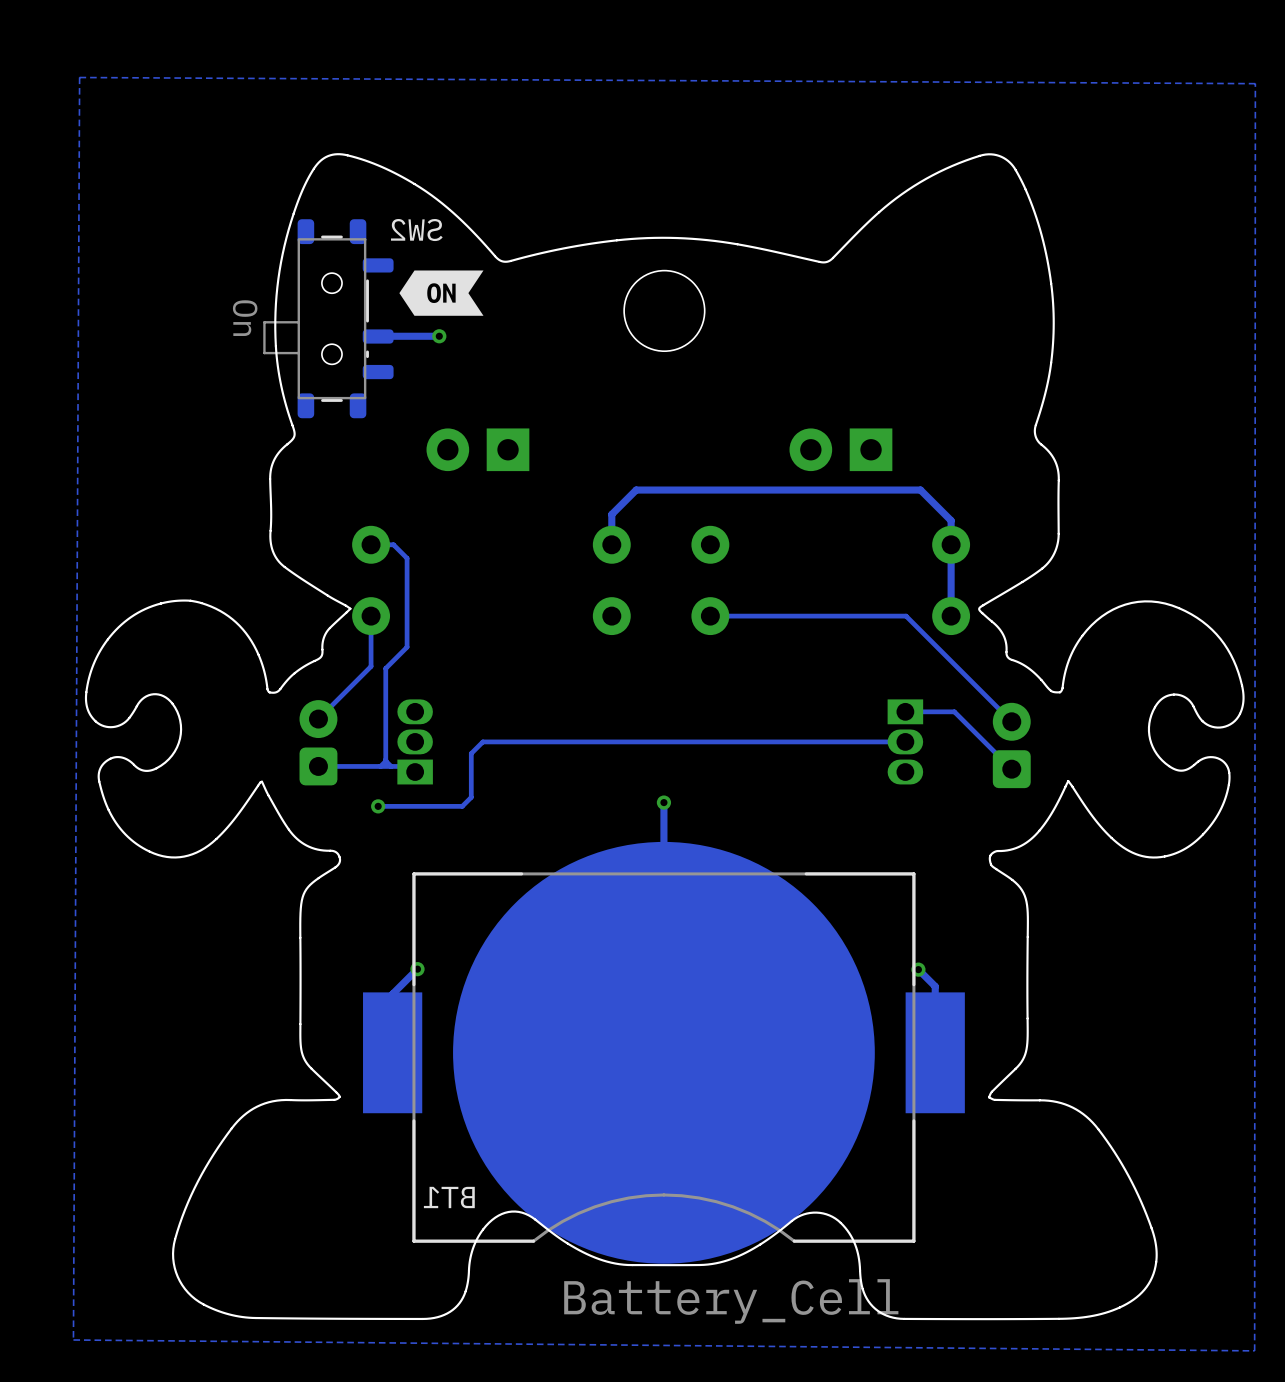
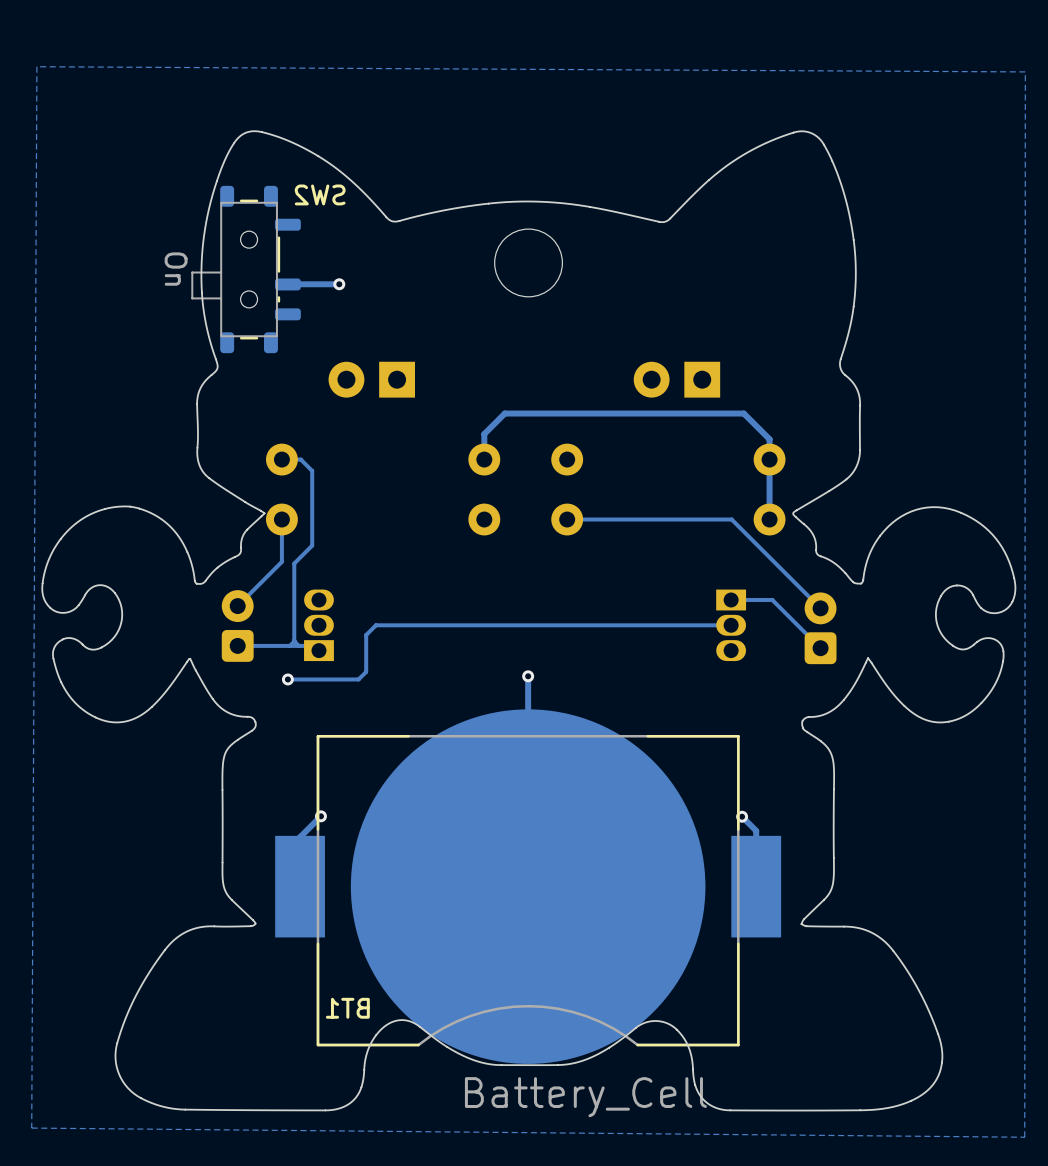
drawing: [399, 270, 484, 316] -> none

